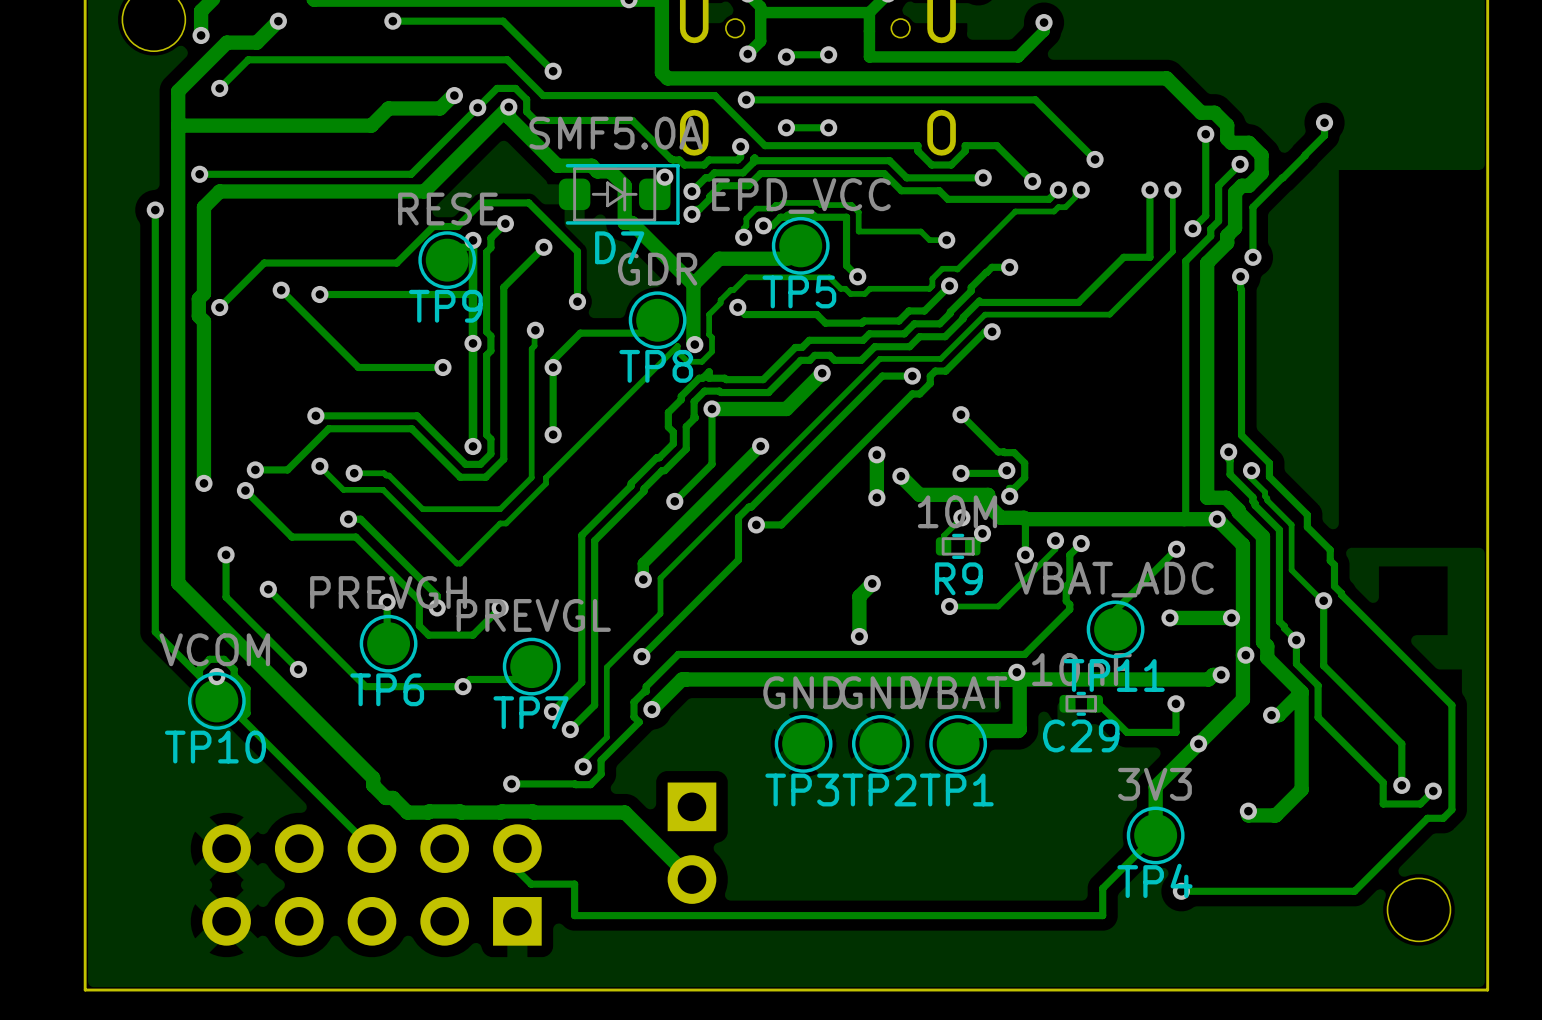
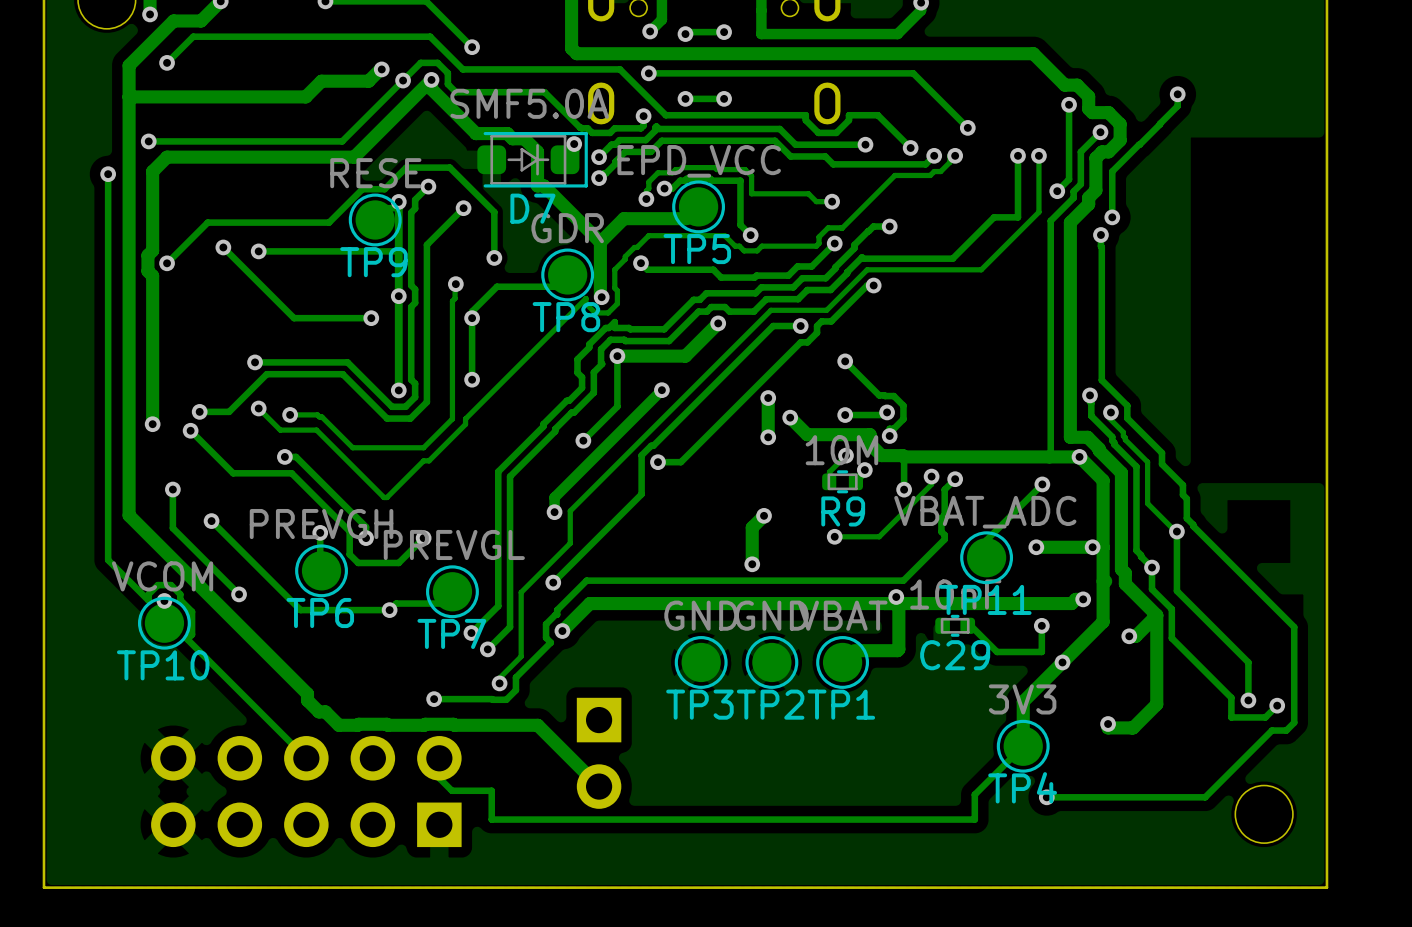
via: (1245, 655) -> none

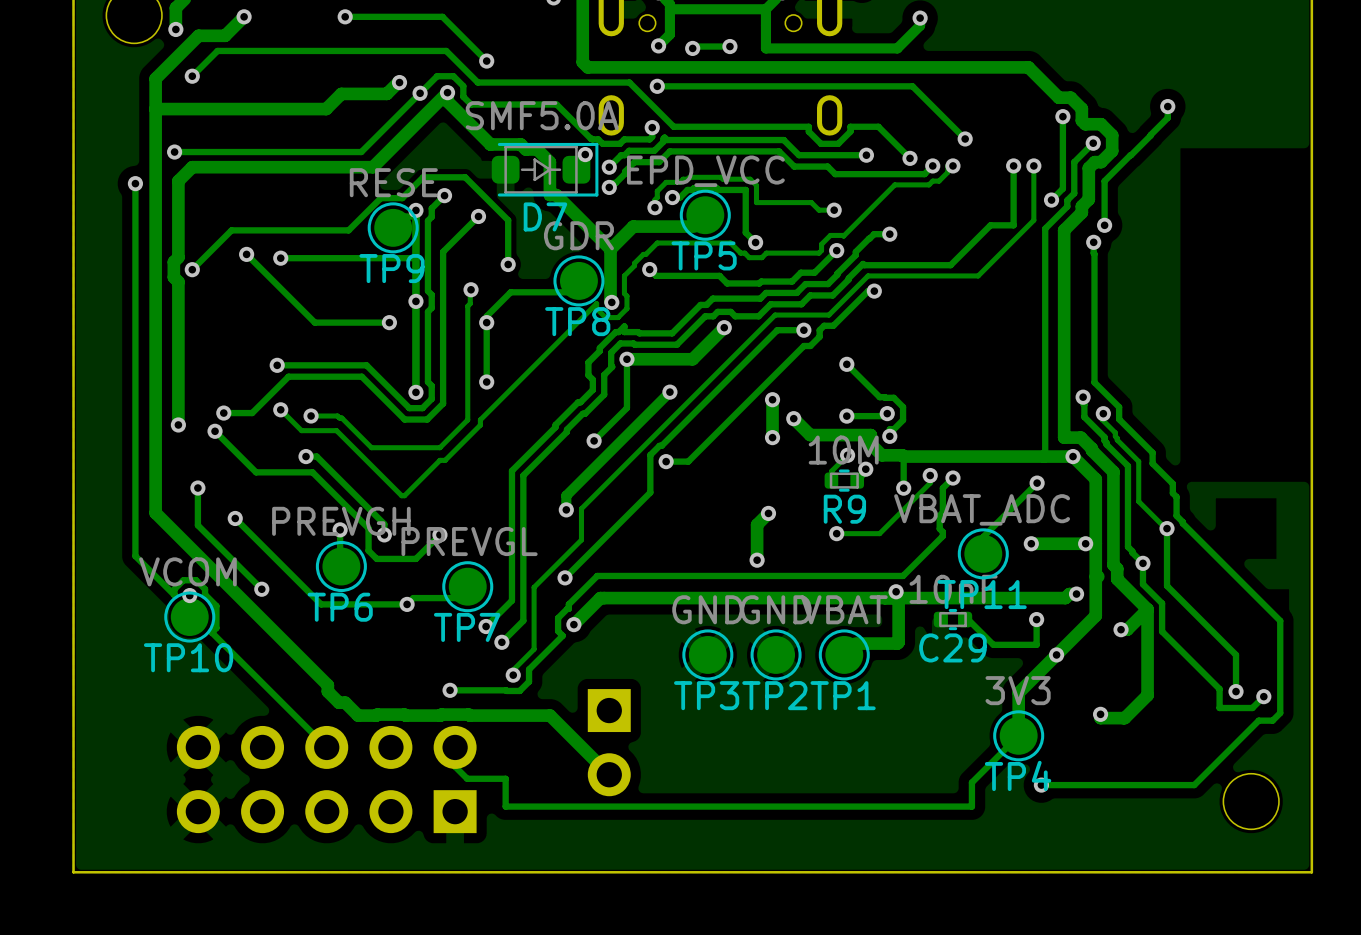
via: (685, 98) -> none
track: (724, 98) (685, 98) -> none
via: (724, 98) -> none

